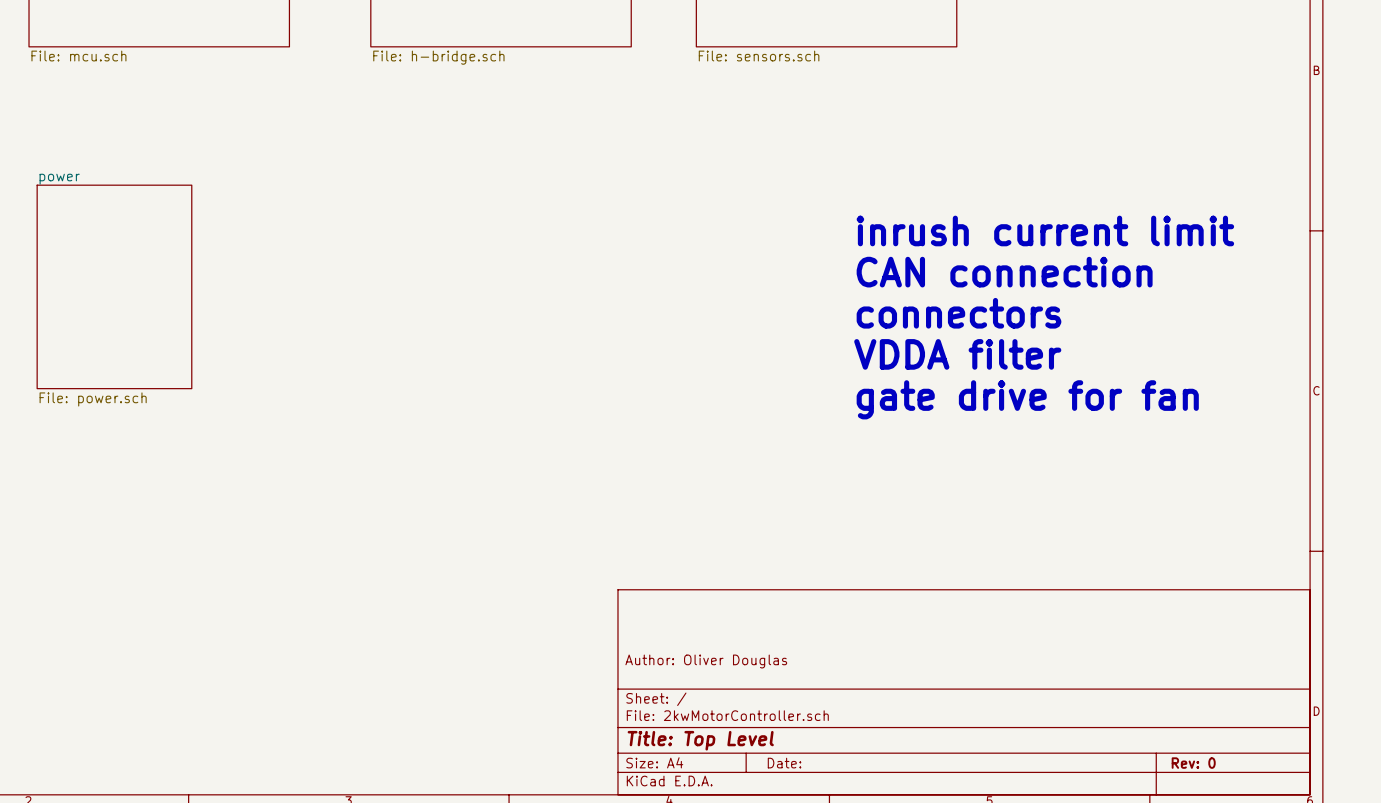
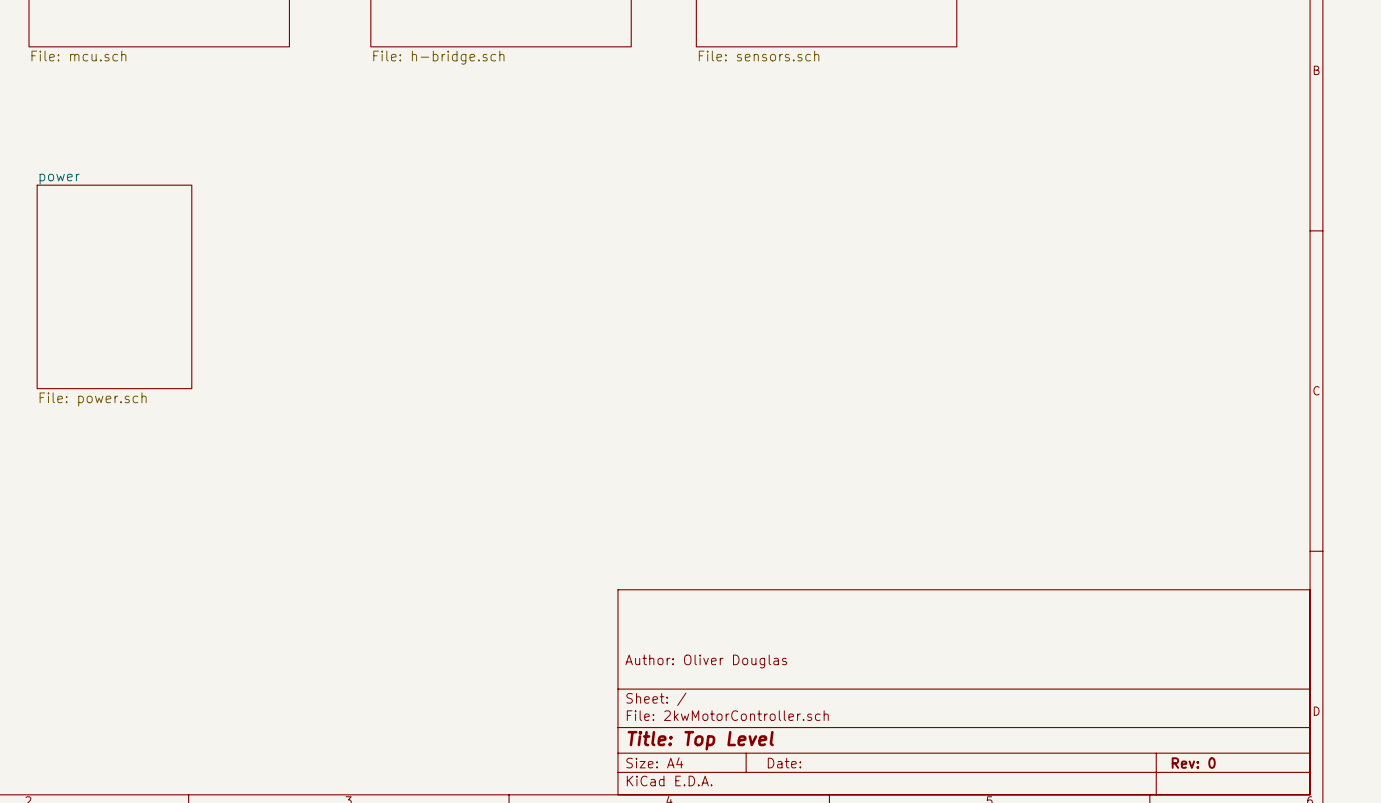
text: inrush current limit (1045, 230) -> none
text: CAN connection (1004, 272) -> none
text: connectors (958, 313) -> none
text: VDDA filter (957, 354) -> none
text: gate drive for fan (1027, 399) -> none

